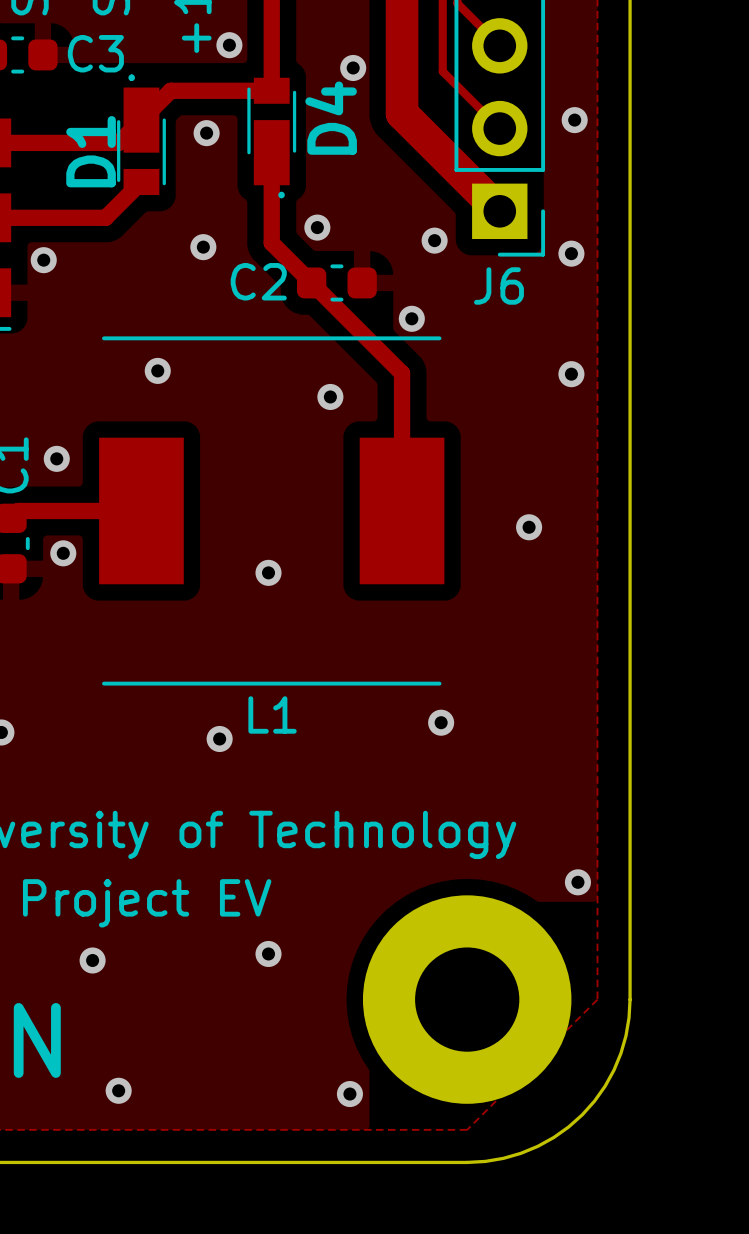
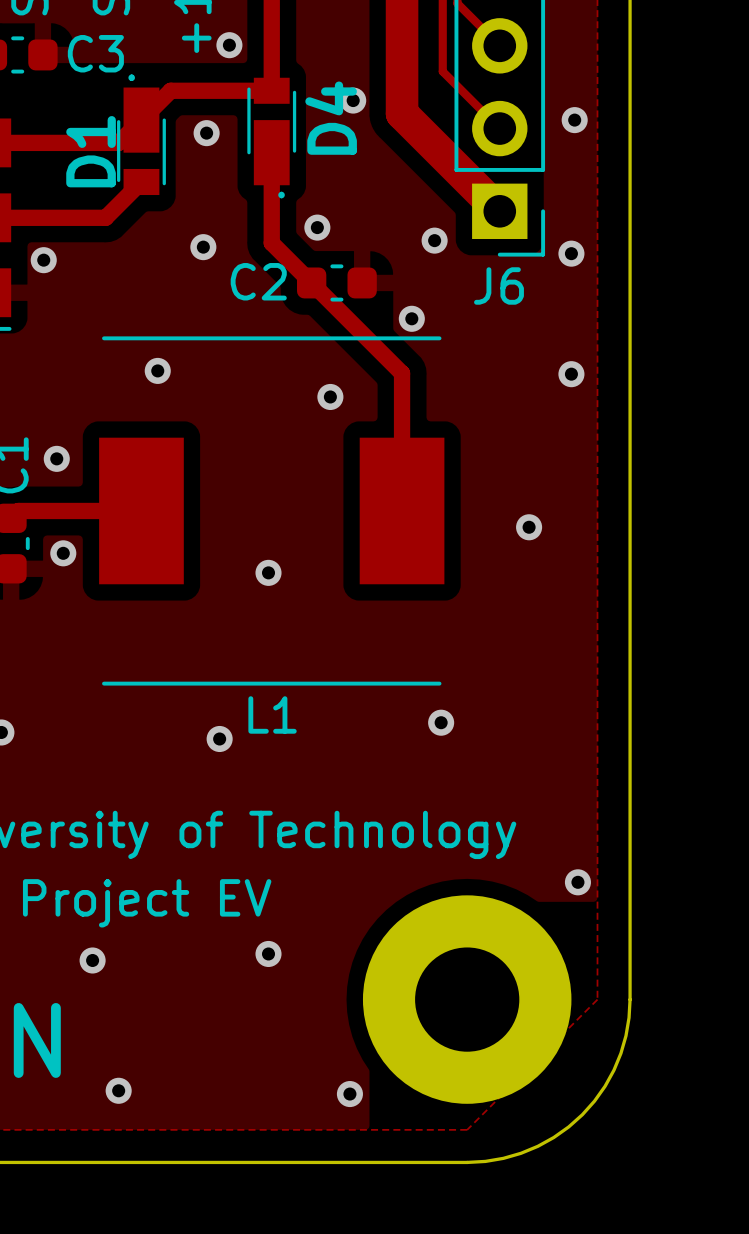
via position: (353, 67) -> (353, 100)

